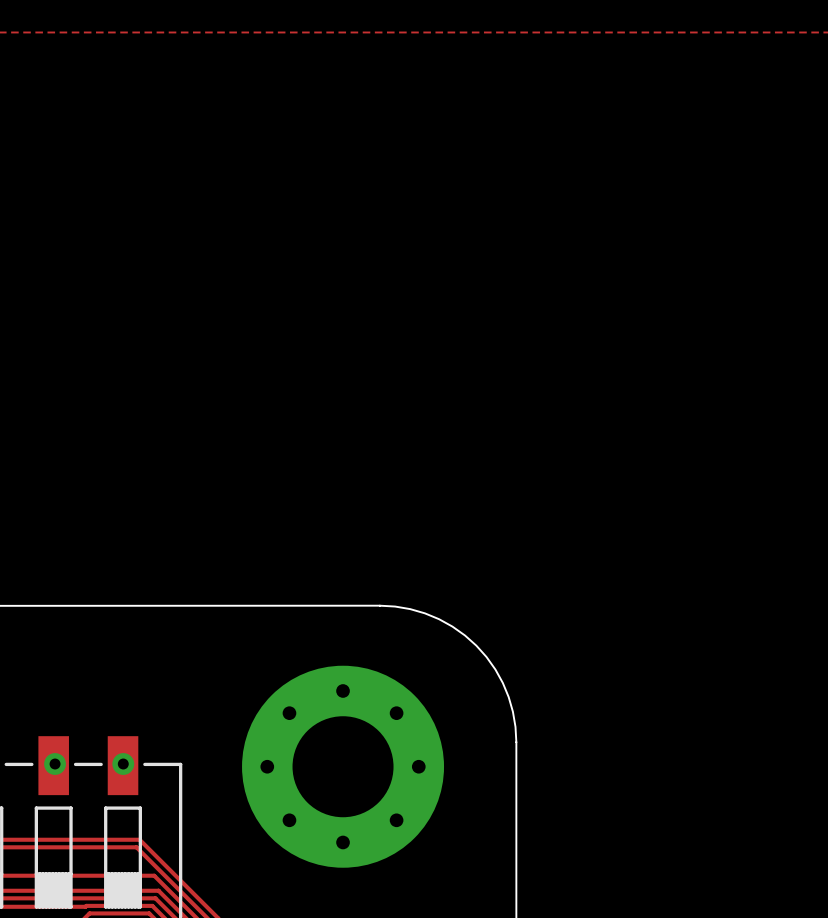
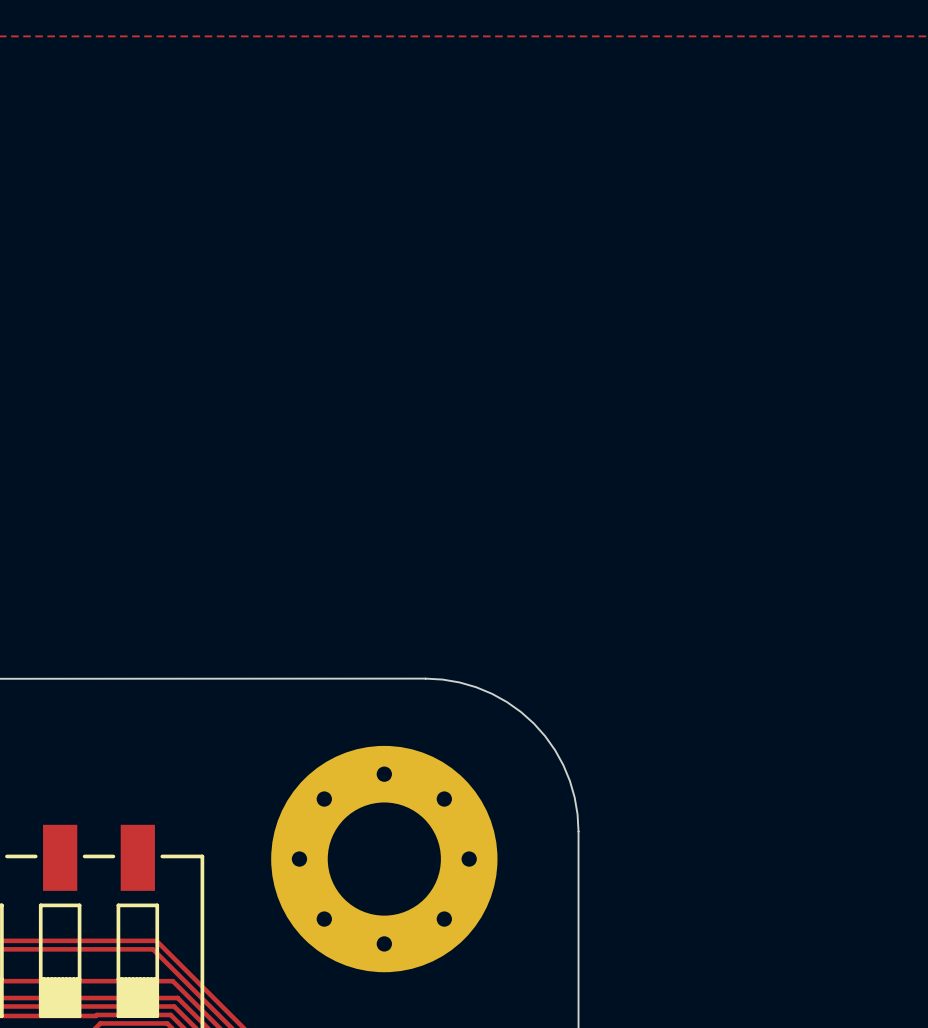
via: (55, 764) -> none
via: (123, 764) -> none

